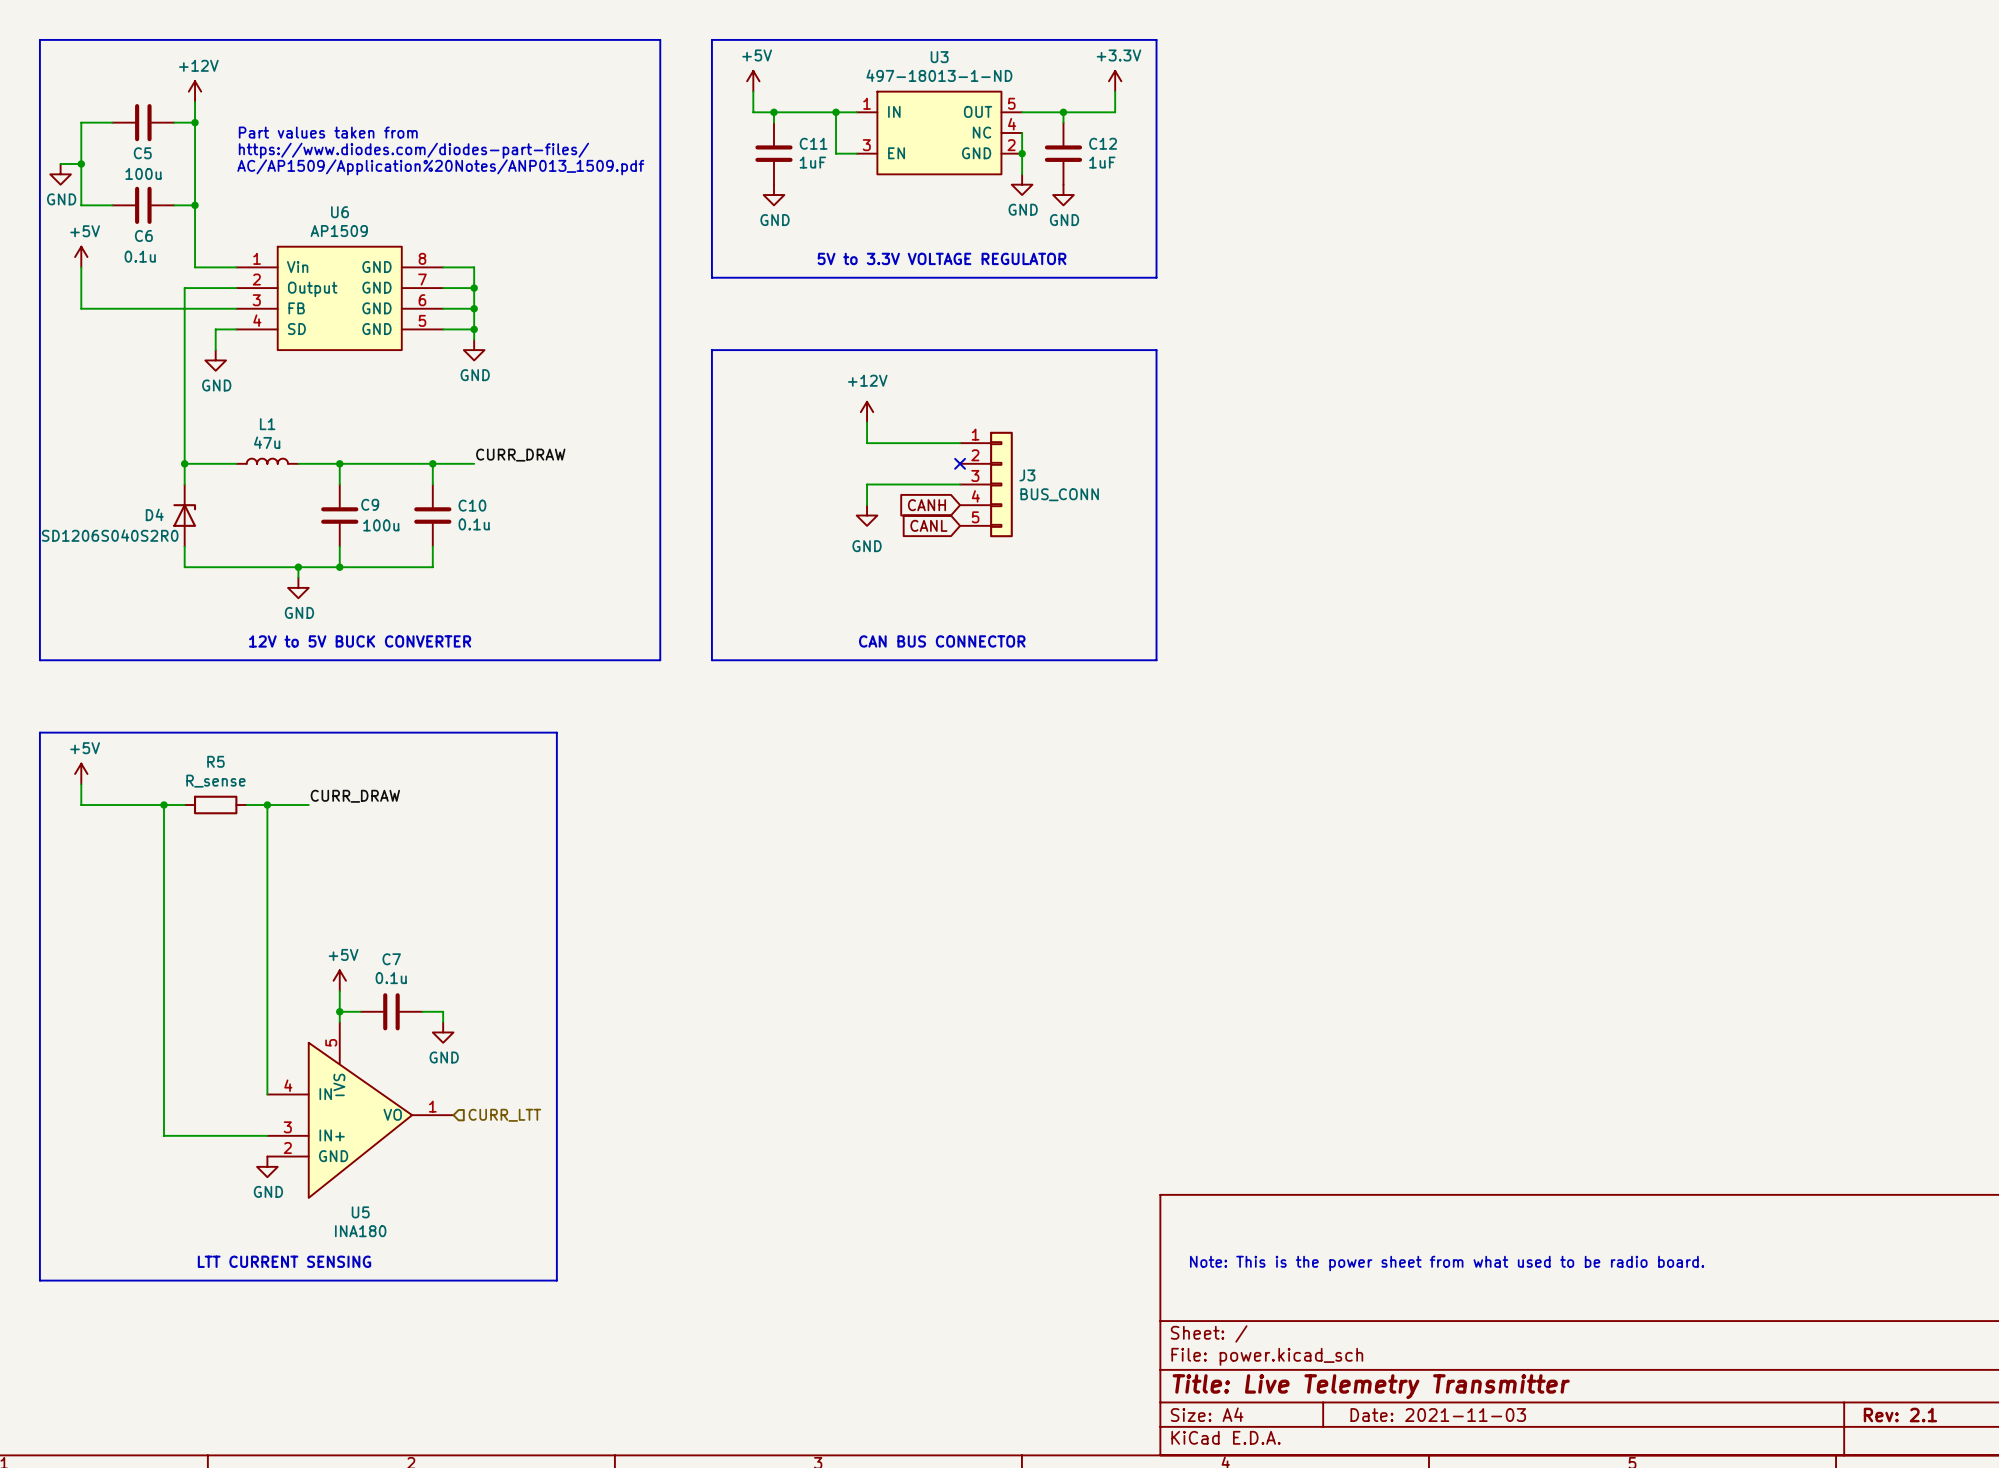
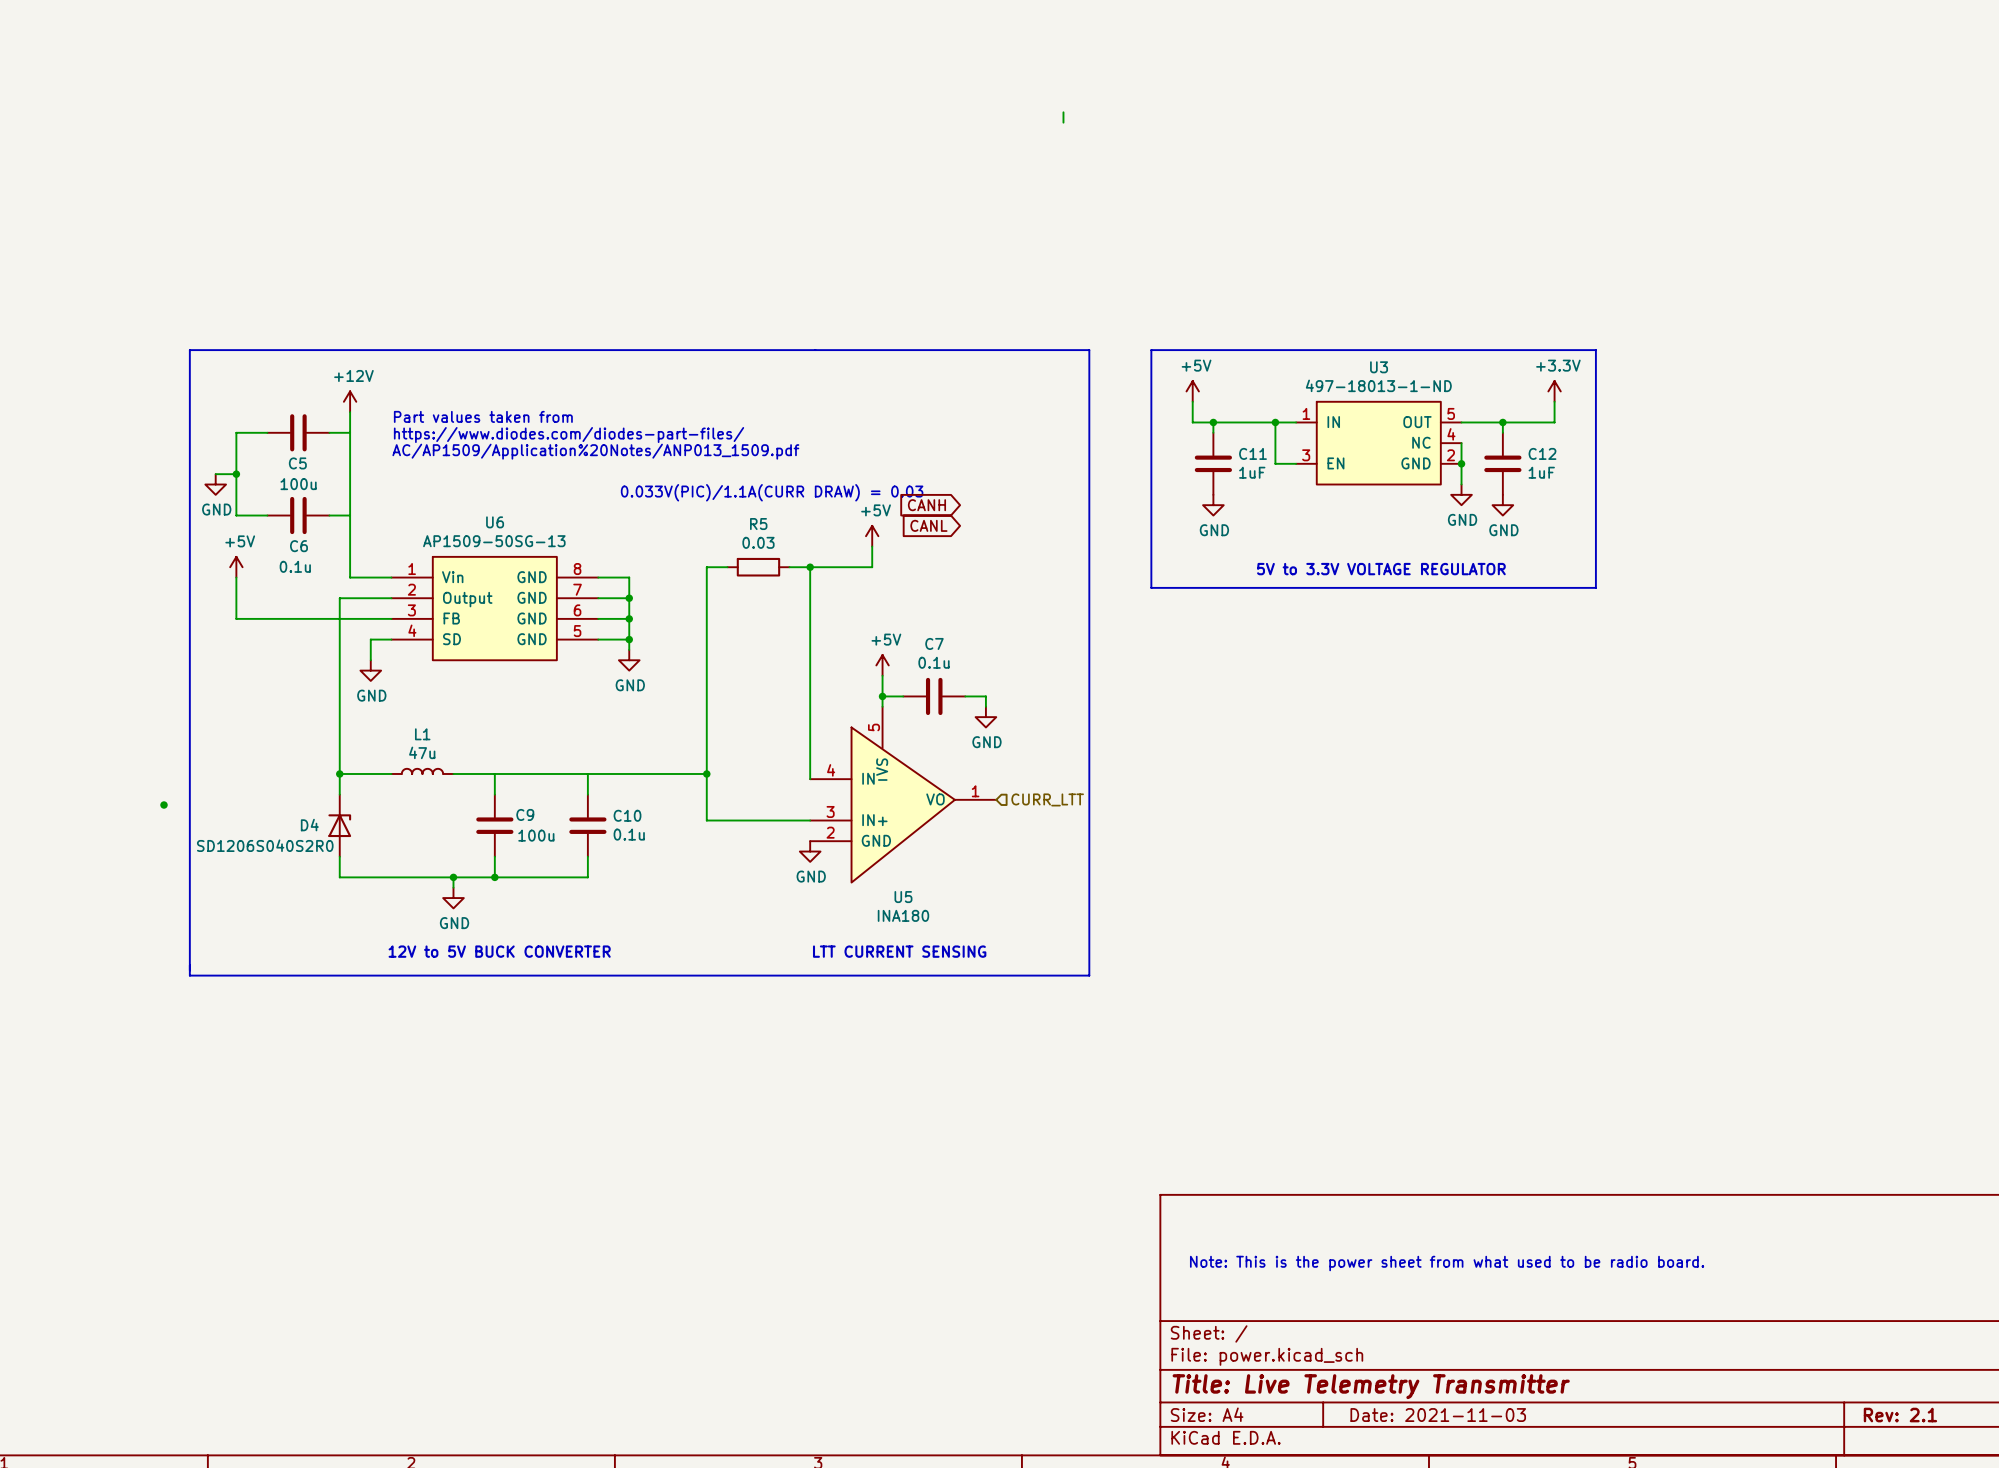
line: (39, 39) (660, 39) (660, 660) (39, 660) (39, 39) -> none
line: (711, 39) (1156, 39) (1156, 277) (711, 277) (711, 39) -> none
power symbol: +5V (753, 81) -> none
power symbol: +3.3V (1115, 81) -> none
power symbol: +12V (195, 91) -> none
wire: (753, 91) (753, 112) (856, 112) -> none
wire: (1115, 91) (1115, 112) (1022, 112) -> none
wire: (195, 101) (195, 267) (236, 267) -> none
wire: (773, 112) (773, 122) -> none
junction: (773, 112) -> none
wire: (836, 112) (836, 153) (856, 153) -> none
junction: (836, 112) -> none
junction: (1063, 112) -> none
wire: (112, 122) (81, 122) (81, 205) (112, 205) -> none
C5 position: (143, 122) -> (298, 432)
wire: (174, 122) (195, 122) -> none
junction: (195, 122) -> none
text: Part values taken from (328, 132) -> none
U3 position: (939, 132) -> (1378, 443)
wire: (1022, 132) (1022, 174) -> none
text: https://www.diodes.com/diodes-part-files/ (413, 150) -> none
C11 position: (773, 153) -> (1213, 463)
junction: (1022, 153) -> none
C12 position: (1063, 153) -> (1502, 463)
wire: (60, 164) (81, 164) -> none
junction: (81, 164) -> none
text: AC/AP1509/Application%20Notes/ANP013_1509.pdf (440, 167) -> none
power symbol: GND (60, 174) -> none
power symbol: GND (1022, 184) -> none
power symbol: GND (773, 195) -> none
power symbol: GND (1063, 195) -> none
C6 position: (143, 205) -> (298, 515)
wire: (174, 205) (195, 205) -> none
junction: (195, 205) -> none
U6 value: AP1509 (339, 231) -> AP1509-50SG-13 (494, 541)
power symbol: +5V (81, 257) -> none
text: 5V to 3.3V VOLTAGE REGULATOR (942, 258) -> none
wire: (81, 267) (81, 308) (236, 308) -> none
wire: (443, 267) (474, 267) (474, 339) -> none
wire: (236, 288) (184, 288) (184, 484) -> none
wire: (443, 288) (474, 288) -> none
junction: (474, 288) -> none
U6 position: (339, 298) -> (494, 608)
wire: (443, 308) (474, 308) -> none
junction: (474, 308) -> none
wire: (236, 329) (215, 329) (215, 350) -> none
wire: (443, 329) (474, 329) -> none
junction: (474, 329) -> none
power symbol: GND (474, 350) -> none
line: (711, 350) (711, 660) (1156, 660) (1156, 350) -> (711, 350) (189, 350) (189, 975) (1089, 975) (1089, 350)
line: (1089, 350) (1151, 350) -> (1156, 350) (1595, 350) (1595, 587) (1151, 587) (1151, 350)
power symbol: GND (215, 360) -> none
power symbol: none -> +5V (1192, 391)
power symbol: none -> +3.3V (1554, 391)
power symbol: none -> +12V (350, 401)
wire: none -> (1192, 401) (1192, 422) (1296, 422)
wire: none -> (1554, 401) (1554, 422) (1461, 422)
wire: none -> (350, 412) (350, 577) (391, 577)
power symbol: +12V (867, 412) -> none
text: none -> Part values taken from (483, 416)
wire: (867, 422) (867, 443) (960, 443) -> none
wire: none -> (1213, 422) (1213, 432)
junction: none -> (1213, 422)
wire: none -> (1275, 422) (1275, 463) (1296, 463)
junction: none -> (1275, 422)
wire: none -> (1502, 422) (1502, 432)
junction: none -> (1502, 422)
wire: none -> (267, 432) (236, 432) (236, 515) (267, 515)
wire: none -> (329, 432) (350, 432)
text: none -> https://www.diodes.com/diodes-part-files/ (569, 435)
wire: none -> (1461, 443) (1461, 484)
text: none -> AC/AP1509/Application%20Notes/ANP013_1509.pdf (595, 451)
label: CURR_DRAW (520, 455) -> none
L1 position: (267, 461) -> (422, 771)
wire: (184, 463) (236, 463) -> none
junction: (184, 463) -> none
wire: (298, 463) (474, 463) -> none
wire: (339, 463) (339, 484) -> none
junction: (339, 463) -> none
wire: (432, 463) (432, 484) -> none
junction: (432, 463) -> none
no-connect mark: (960, 463) -> none
junction: none -> (1461, 463)
wire: none -> (215, 474) (236, 474)
junction: none -> (236, 474)
power symbol: none -> GND (215, 484)
wire: (960, 484) (867, 484) (867, 505) -> none
J3: BUS_CONN (986, 484) -> none
text: none -> 0.033V(PIC)/1.1A(CURR DRAW) = 0.03 (772, 492)
power symbol: none -> GND (1461, 494)
power symbol: none -> GND (1213, 505)
power symbol: none -> GND (1502, 505)
D4 position: (184, 515) -> (339, 825)
wire: none -> (329, 515) (350, 515)
C9 position: (339, 515) -> (494, 825)
C10 position: (432, 515) -> (587, 825)
power symbol: GND (867, 515) -> none
power symbol: none -> +5V (872, 536)
wire: (184, 546) (184, 567) (432, 567) (432, 546) -> none
wire: (339, 546) (339, 567) -> none
wire: none -> (872, 546) (872, 567) (789, 567)
power symbol: none -> +5V (236, 567)
junction: (298, 567) -> none
junction: (339, 567) -> none
wire: none -> (727, 567) (706, 567) (706, 820) (810, 820)
wire: none -> (810, 567) (810, 779)
junction: none -> (810, 567)
text: none -> 5V to 3.3V VOLTAGE REGULATOR (1381, 569)
wire: none -> (236, 577) (236, 618) (391, 618)
wire: none -> (598, 577) (629, 577) (629, 649)
power symbol: GND (298, 587) -> none
wire: none -> (391, 598) (339, 598) (339, 794)
wire: none -> (598, 598) (629, 598)
junction: none -> (629, 598)
wire: none -> (598, 618) (629, 618)
junction: none -> (629, 618)
wire: none -> (391, 639) (370, 639) (370, 660)
wire: none -> (598, 639) (629, 639)
junction: none -> (629, 639)
text: 12V to 5V BUCK CONVERTER (360, 641) -> none
text: CAN BUS CONNECTOR (942, 641) -> none
power symbol: none -> GND (629, 660)
power symbol: none -> +5V (882, 665)
power symbol: none -> GND (370, 670)
wire: none -> (882, 675) (882, 706)
wire: none -> (882, 696) (903, 696)
junction: none -> (882, 696)
wire: none -> (965, 696) (985, 696) (985, 706)
power symbol: none -> GND (985, 717)
line: (39, 732) (39, 1280) (556, 1280) (556, 732) (39, 732) -> none
power symbol: +5V (81, 773) -> none
wire: none -> (339, 773) (391, 773)
junction: none -> (339, 773)
wire: none -> (453, 773) (706, 773)
wire: none -> (494, 773) (494, 794)
wire: none -> (587, 773) (587, 794)
junction: none -> (706, 773)
R5 value: R_sense (215, 781) -> 0.03 (758, 542)
wire: (81, 784) (81, 805) (184, 805) -> none
label: CURR_DRAW (355, 796) -> none
hierarchical label: none -> CURR_LTT (1047, 799)
wire: (164, 805) (164, 1135) (267, 1135) -> none
R5 position: (215, 805) -> (758, 567)
wire: (246, 805) (308, 805) -> none
wire: (267, 805) (267, 1094) -> none
junction: (267, 805) -> none
power symbol: none -> GND (810, 851)
wire: none -> (339, 856) (339, 877) (587, 877) (587, 856)
wire: none -> (494, 856) (494, 877)
wire: none -> (453, 877) (453, 887)
junction: none -> (453, 877)
junction: none -> (494, 877)
text: none -> 12V to 5V BUCK CONVERTER (499, 951)
text: none -> LTT CURRENT SENSING (899, 951)
power symbol: +5V (339, 980) -> none
wire: (339, 991) (339, 1022) -> none
wire: (339, 1011) (360, 1011) -> none
junction: (339, 1011) -> none
C7 position: (391, 1011) -> (934, 696)
wire: (422, 1011) (443, 1011) (443, 1022) -> none
power symbol position: GND (443, 1032) -> GND (453, 898)
U5 position: (360, 1110) -> (903, 794)
hierarchical label: CURR_LTT (504, 1115) -> none
power symbol: GND (267, 1166) -> none
text: LTT CURRENT SENSING (284, 1261) -> none

